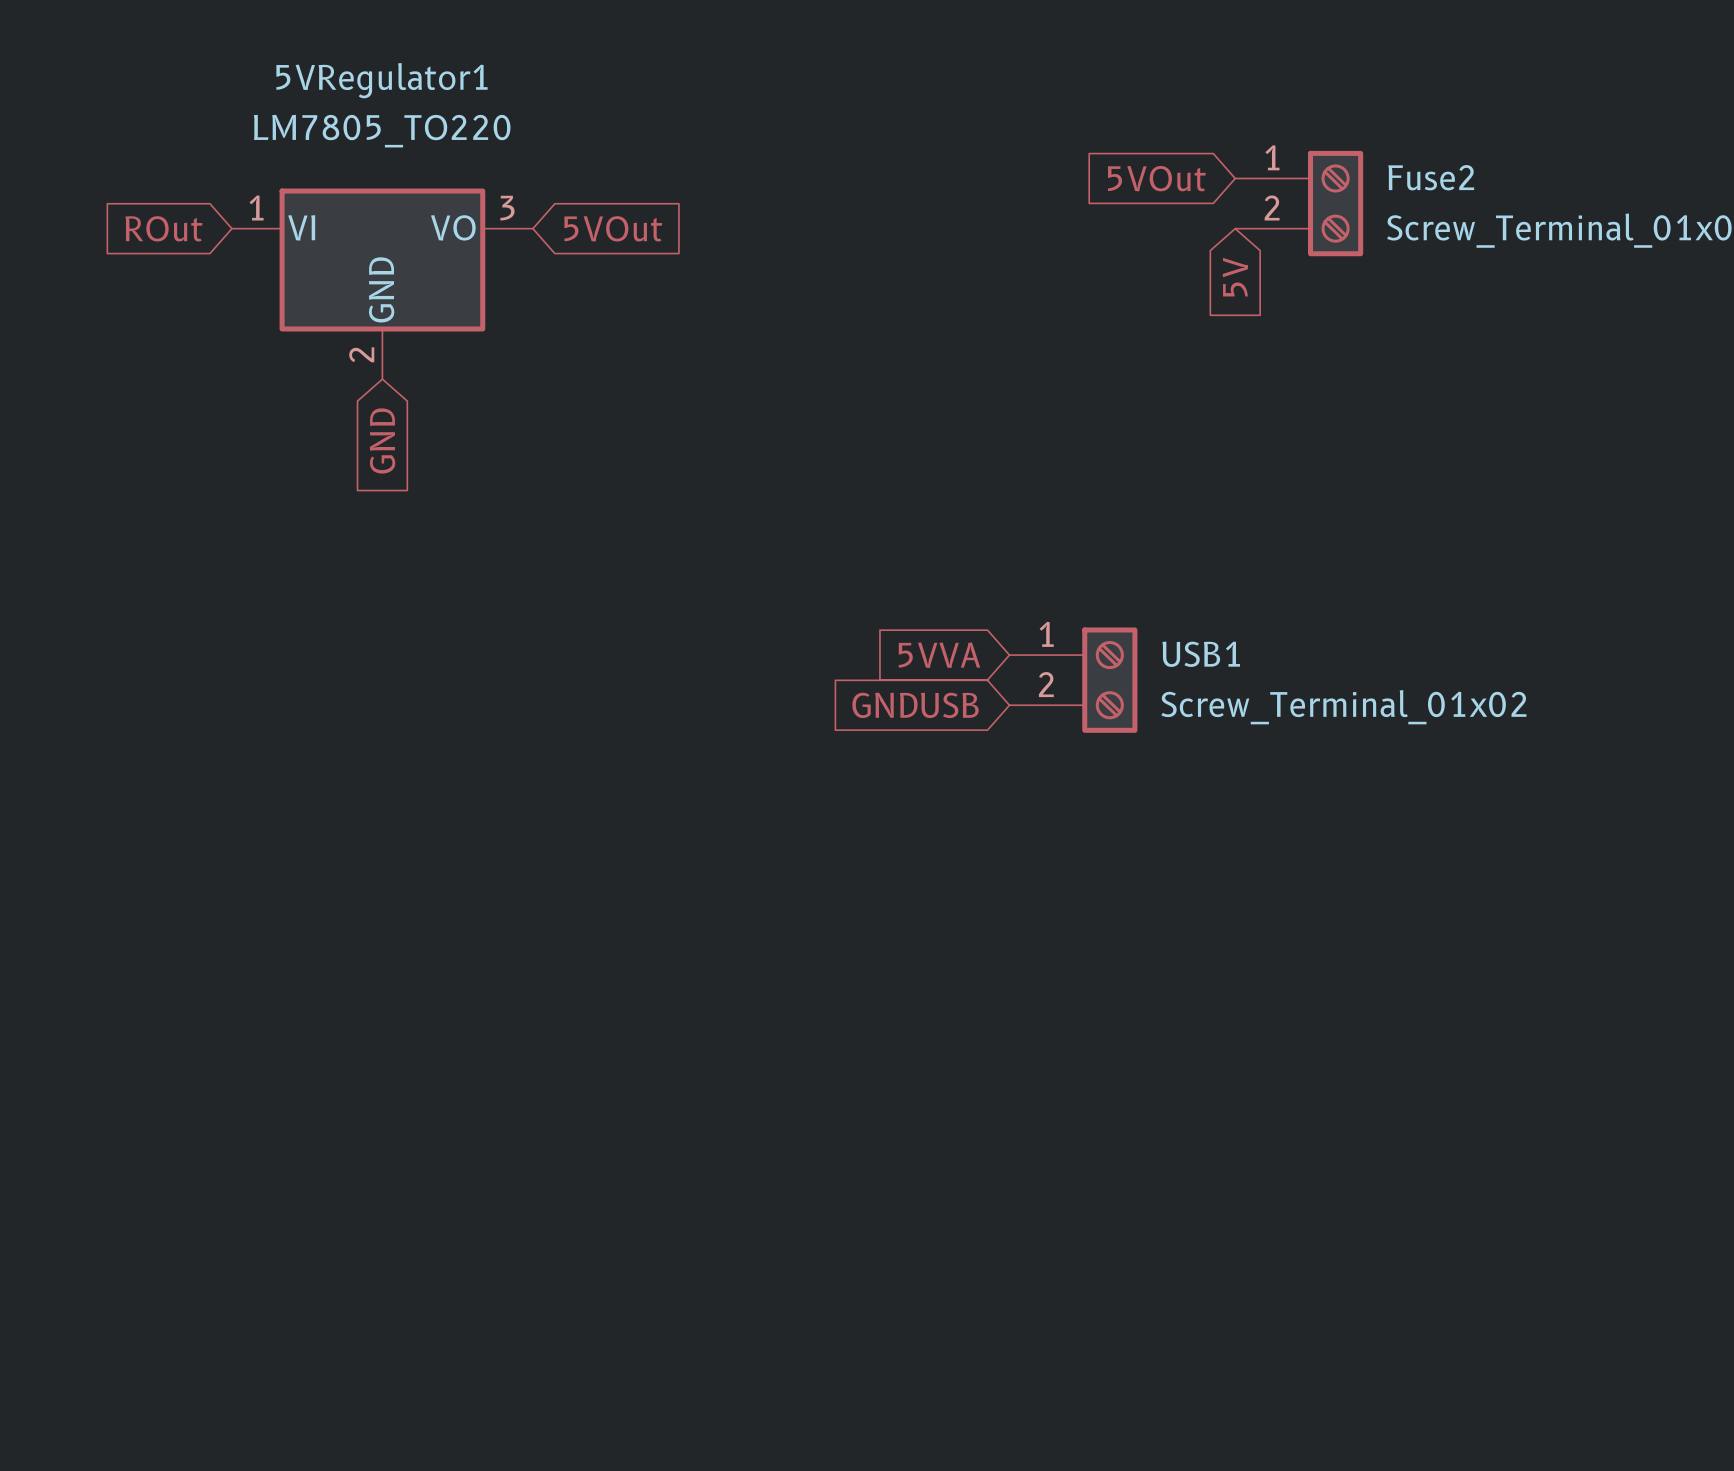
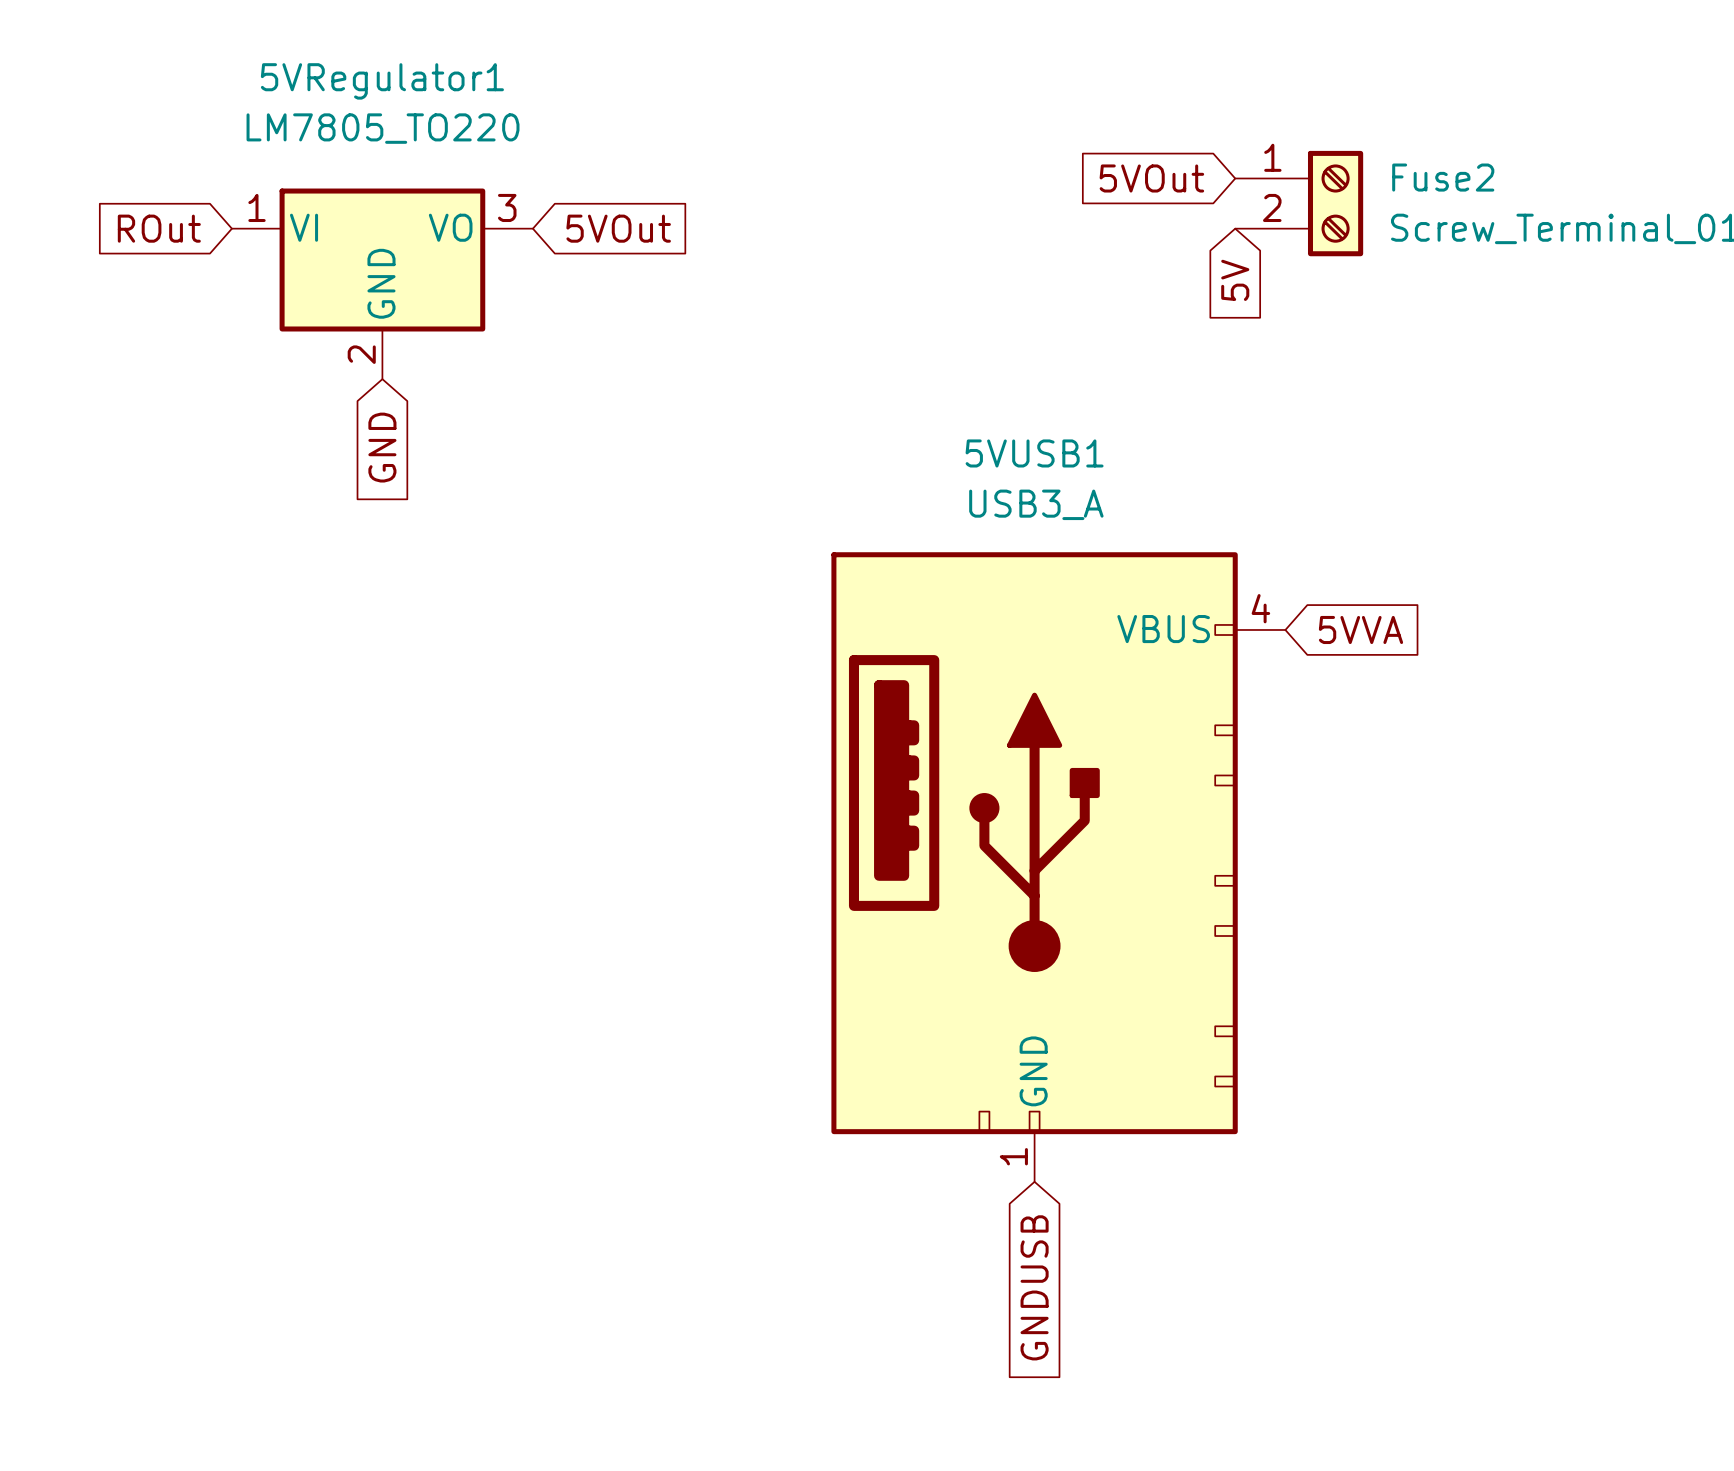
global label rotation: 0° (939, 655) -> 180° (1360, 629)
global label position: 5VVA (939, 655) -> 5VVA (1360, 629)
USB1: Screw_Terminal_01x02 (1073, 680) -> none
global label rotation: 0° (915, 705) -> 90° counterclockwise (1034, 1287)
global label position: GNDUSB (915, 705) -> GNDUSB (1034, 1287)
5VUSB1: none -> USB3_A (1058, 867)

